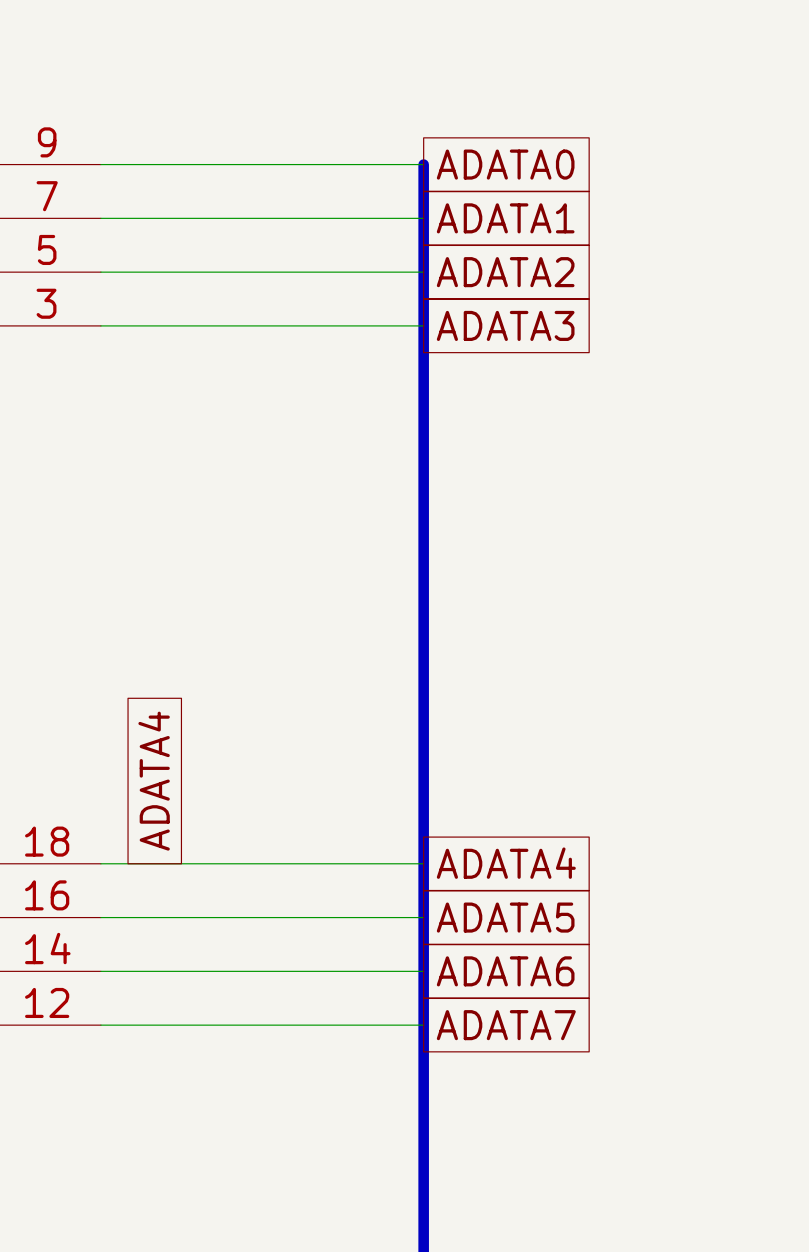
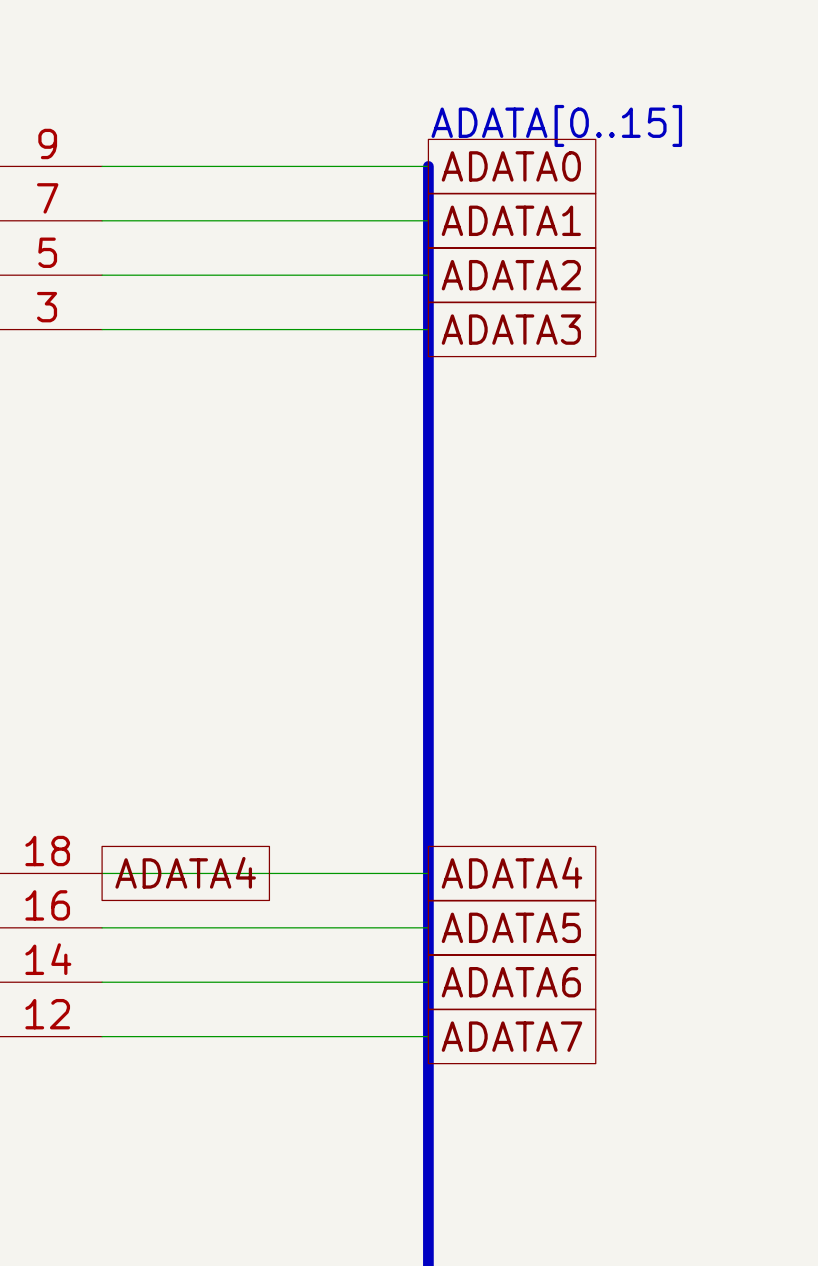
text: none -> ADATA[0..15] (556, 125)
global label rotation: 0° (154, 781) -> 90° clockwise (185, 872)

